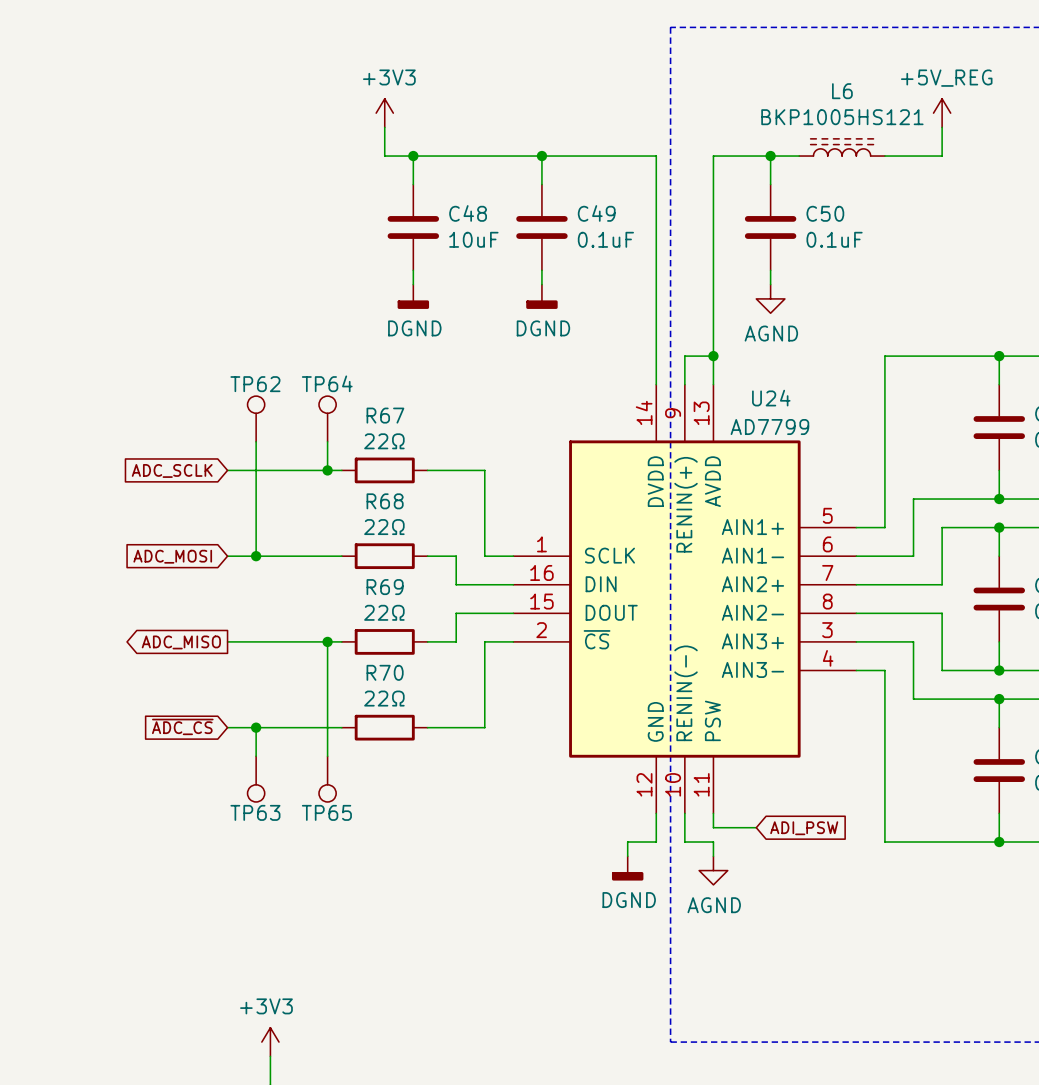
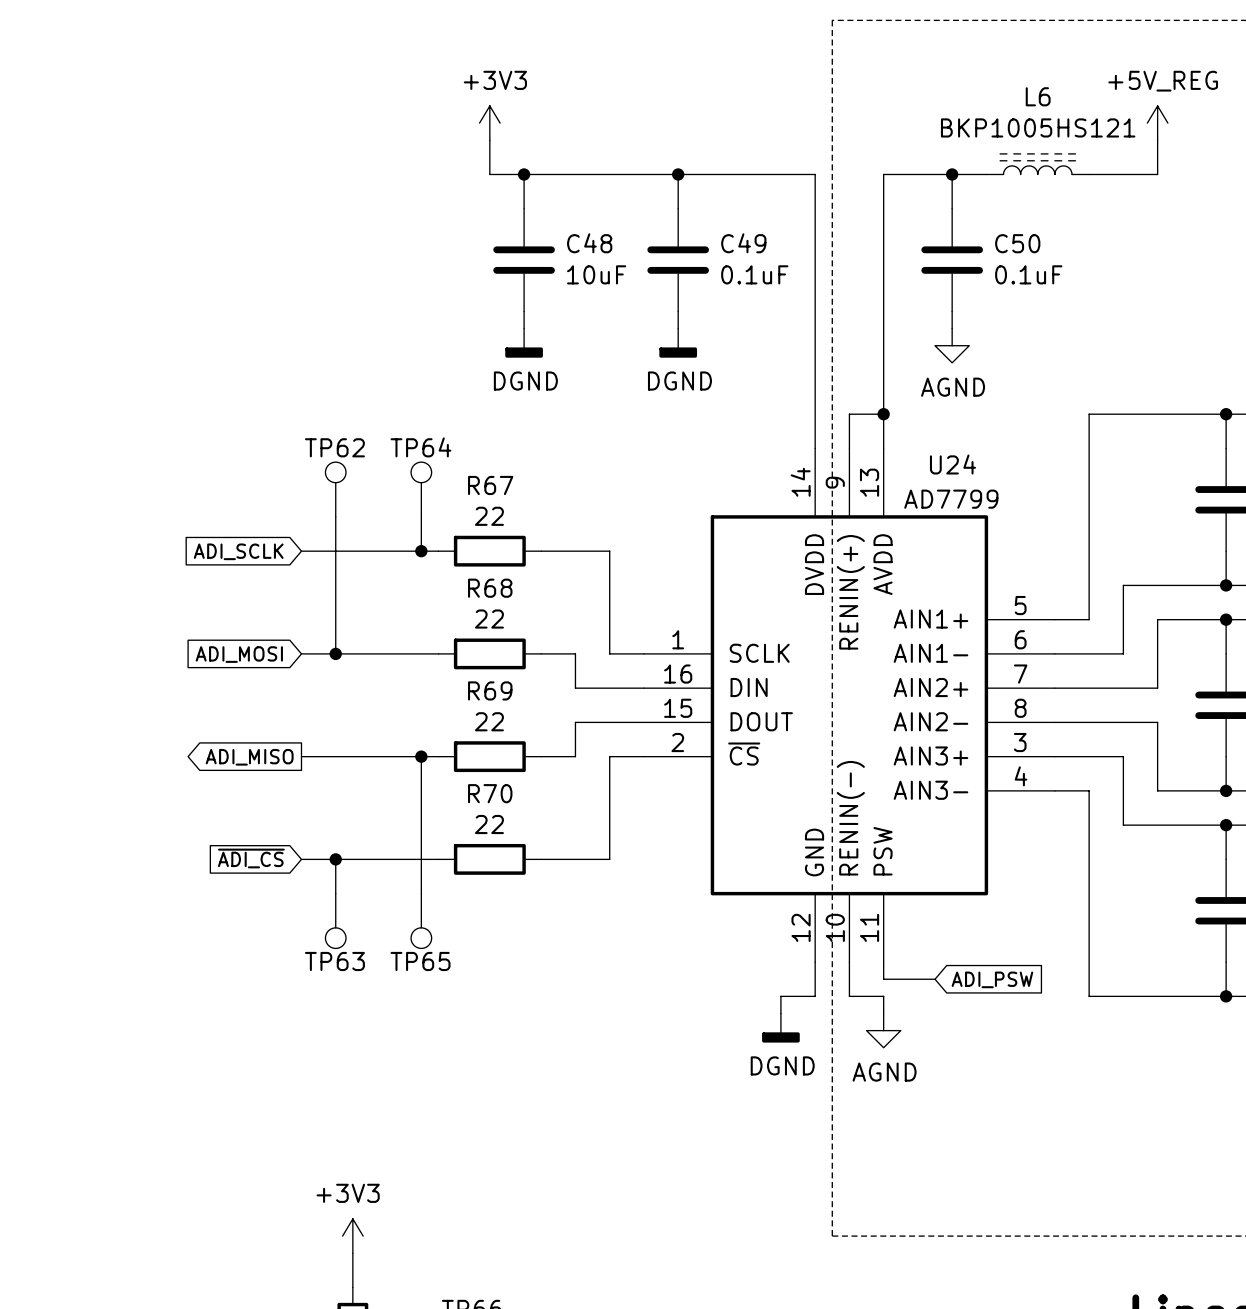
R67 value: 22Ω (384, 441) -> 22 (489, 516)
global label: ADC_SCLK (172, 470) -> ADI_SCLK (238, 551)
R68 value: 22Ω (384, 527) -> 22 (489, 619)
global label: ADC_MOSI (172, 556) -> ADI_MOSI (239, 654)
R69 value: 22Ω (384, 612) -> 22 (489, 721)
global label: ADC_MISO (181, 642) -> ADI_MISO (249, 757)
R70 value: 22Ω (384, 698) -> 22 (489, 824)
global label: ~{ADC_CS} (182, 726) -> ~{ADI_CS} (251, 858)

